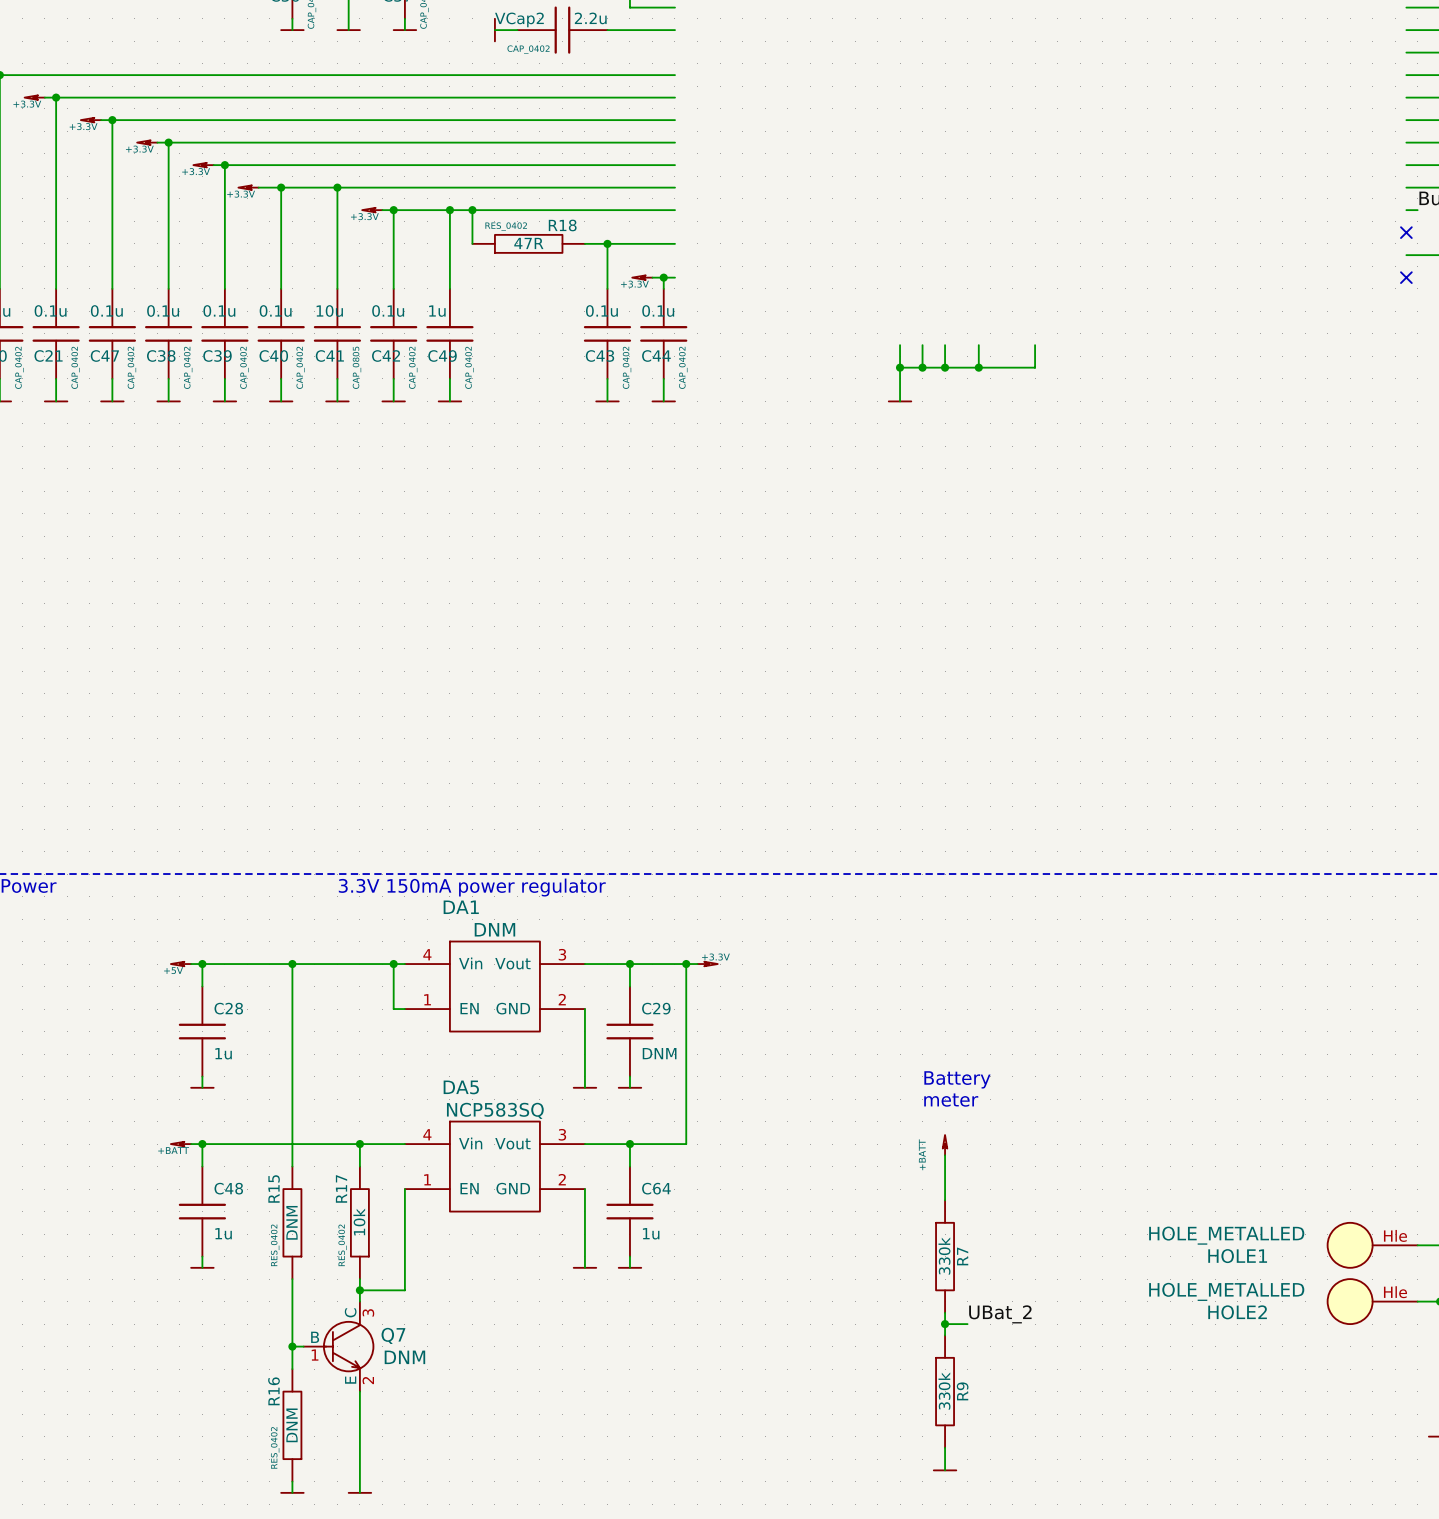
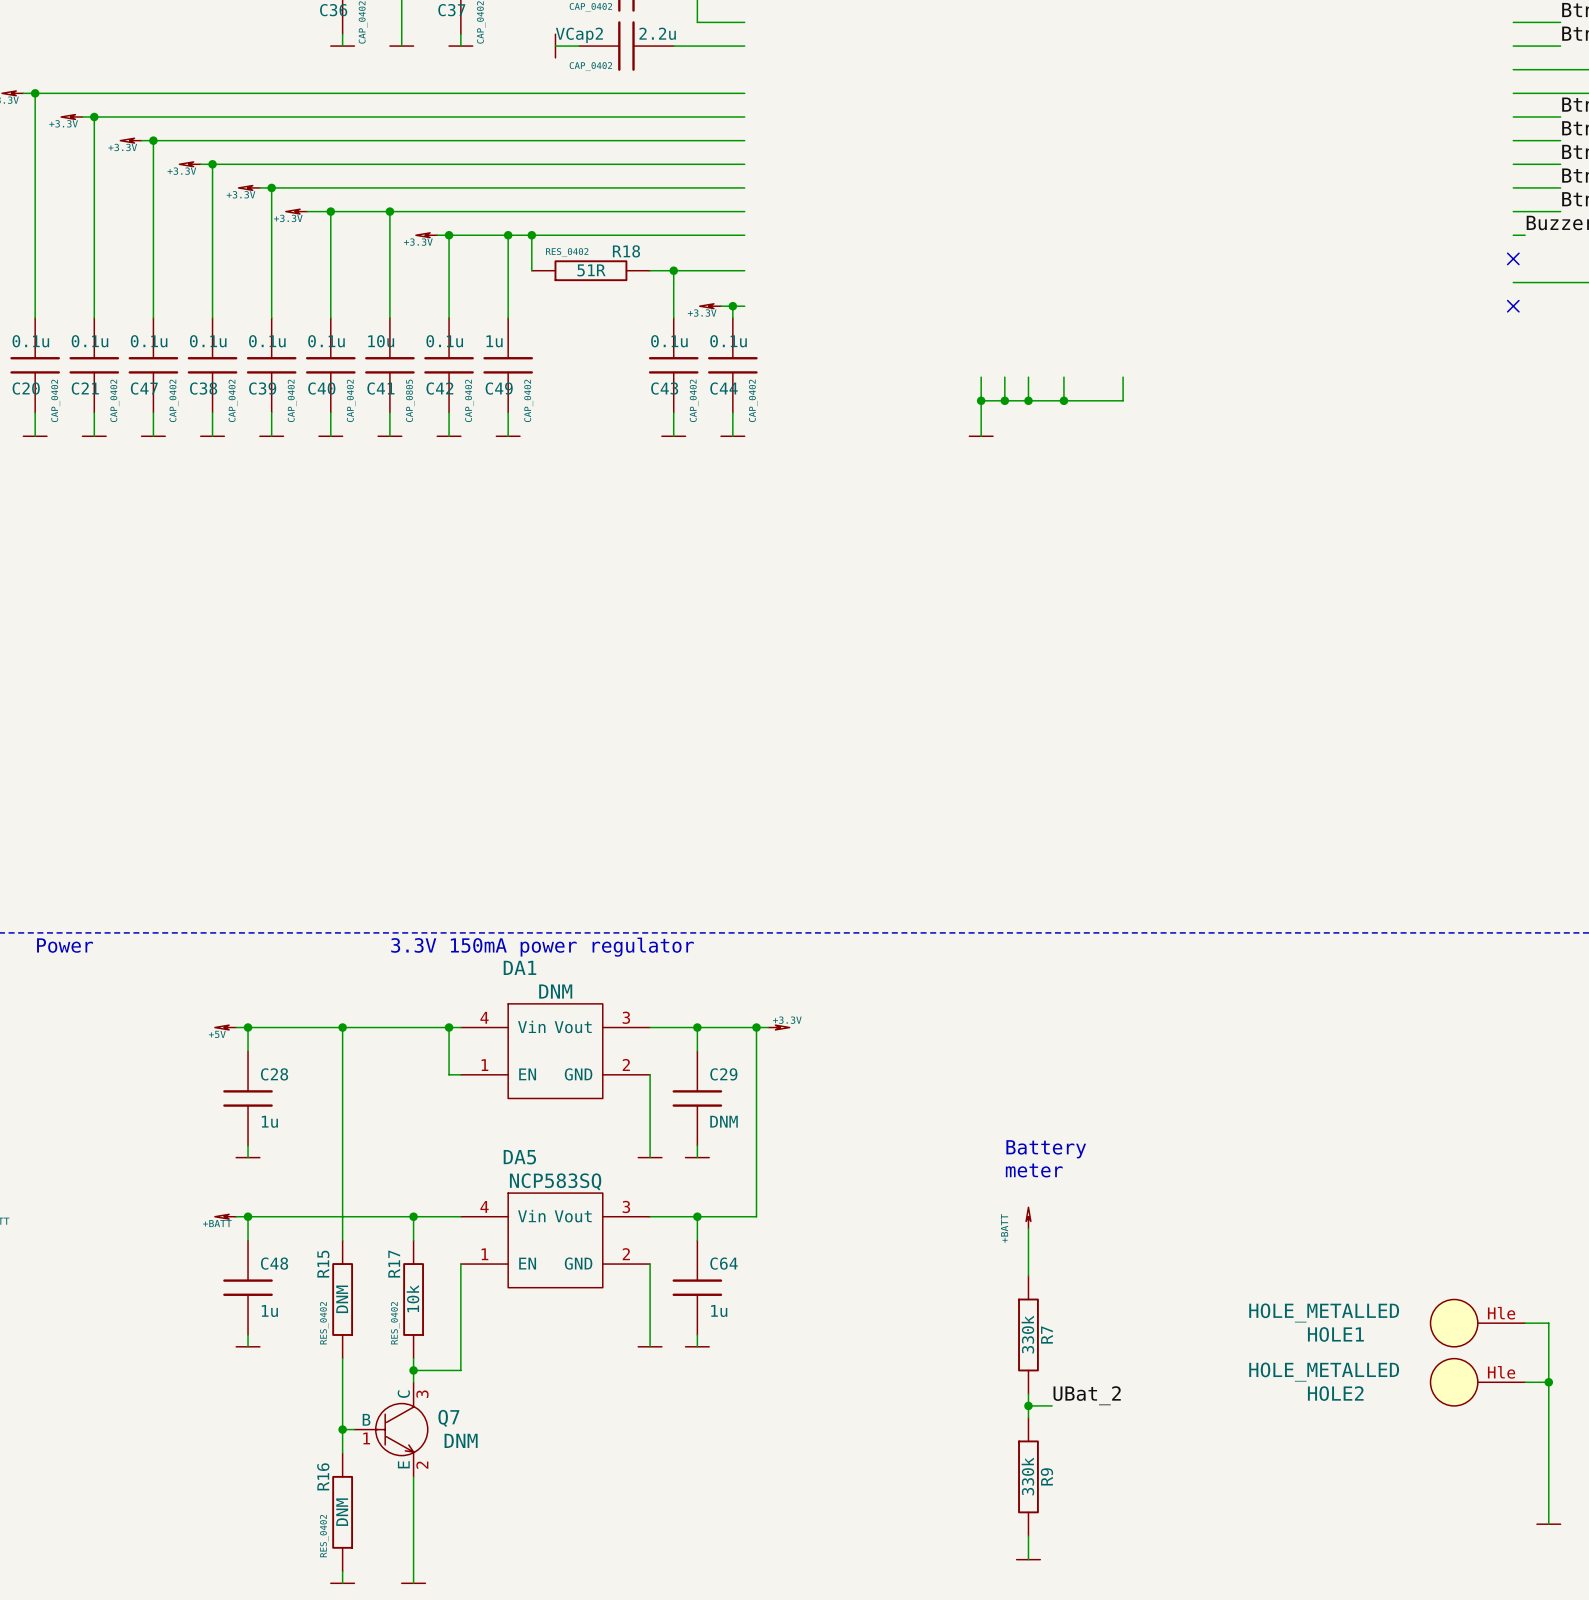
R18 value: 47R (528, 243) -> 51R (591, 270)

